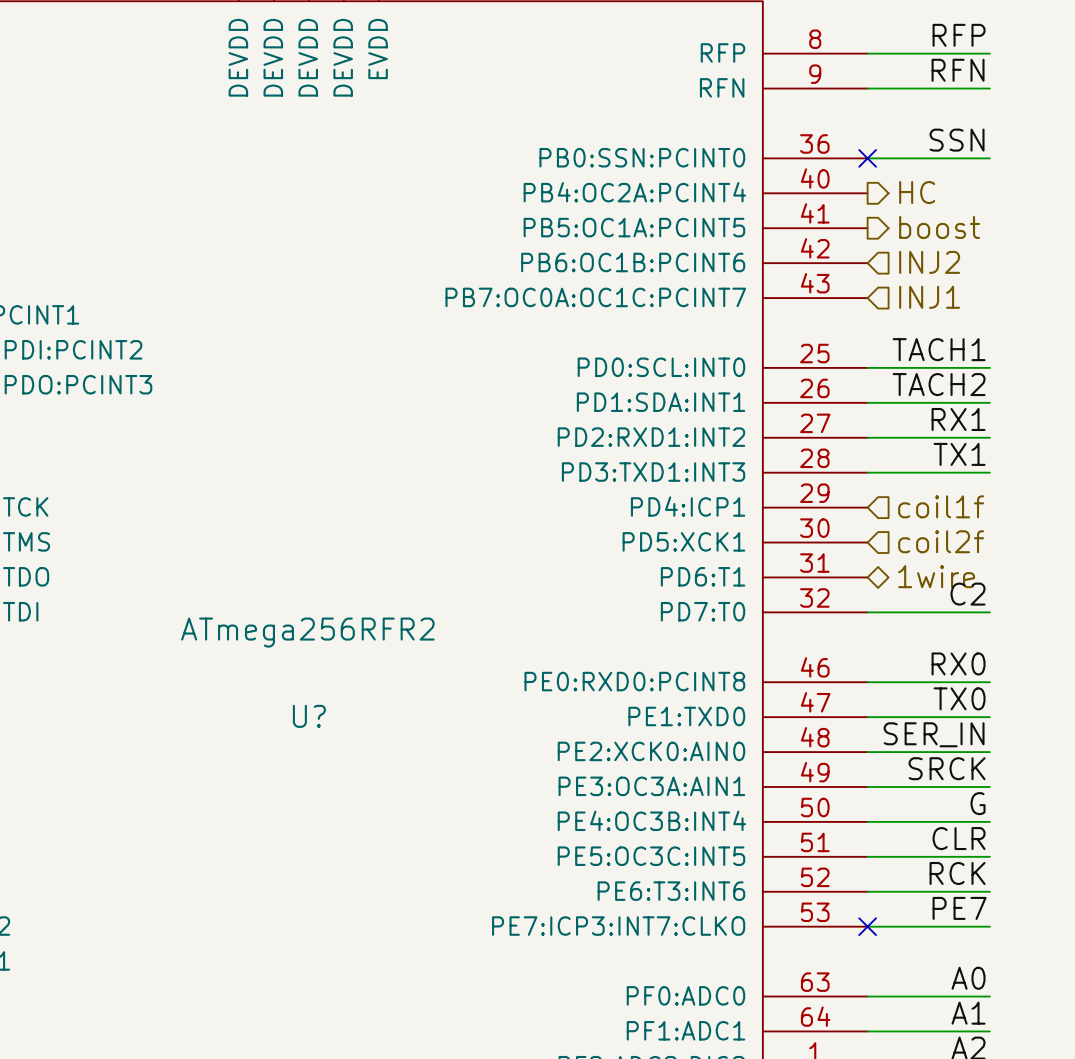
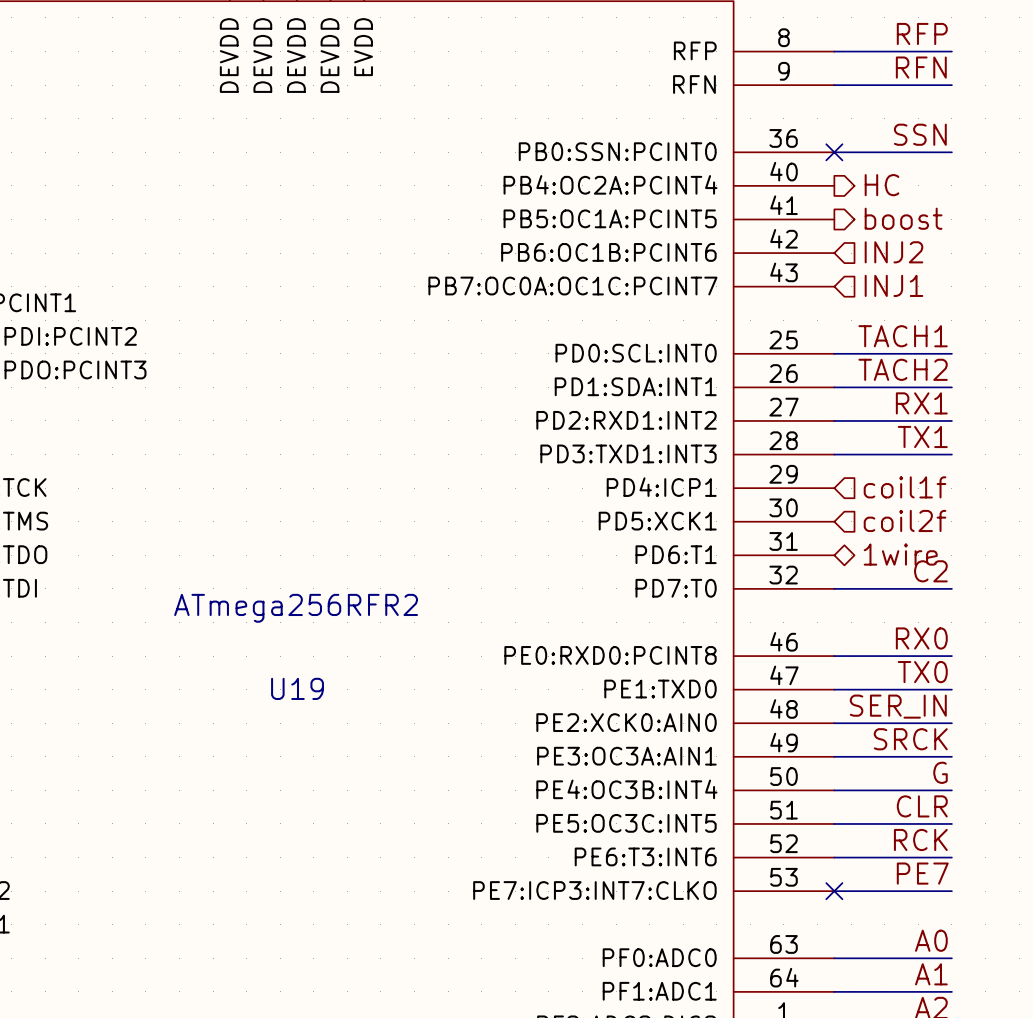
U? name: U? (309, 716) -> U19 (297, 688)

